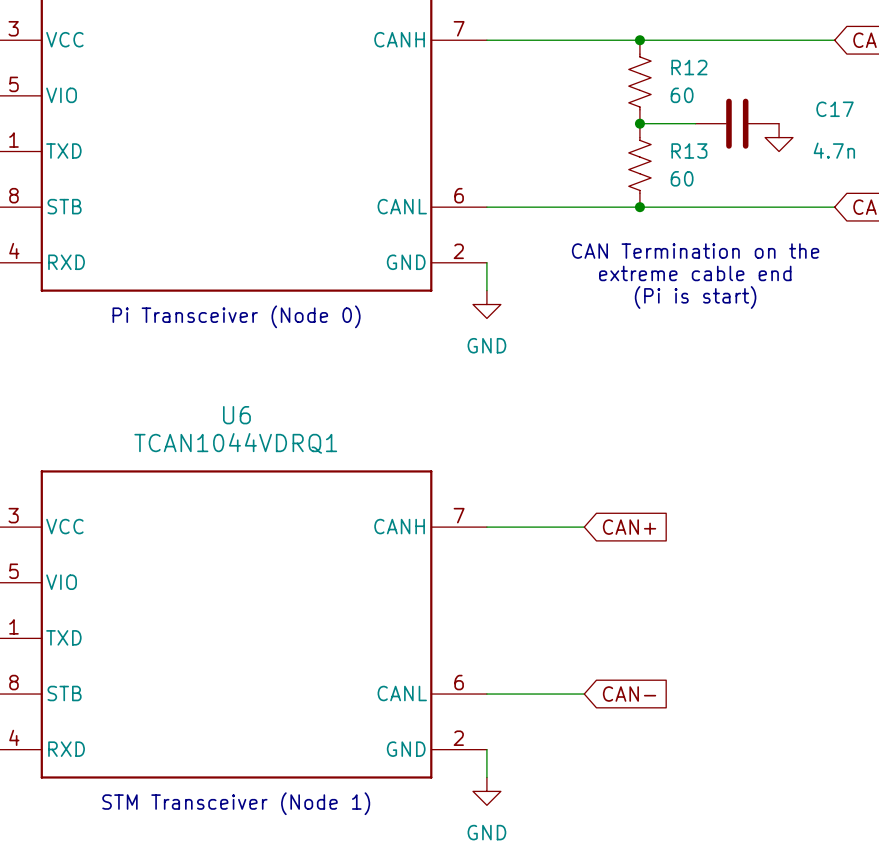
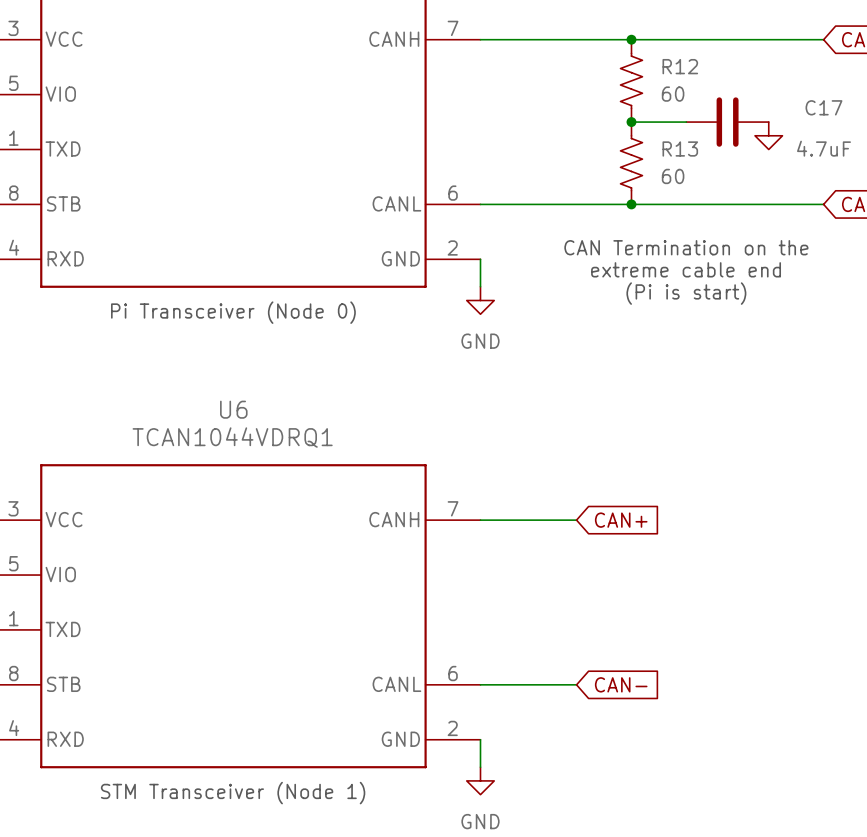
C17 value: 4.7n (834, 150) -> 4.7uF (823, 148)

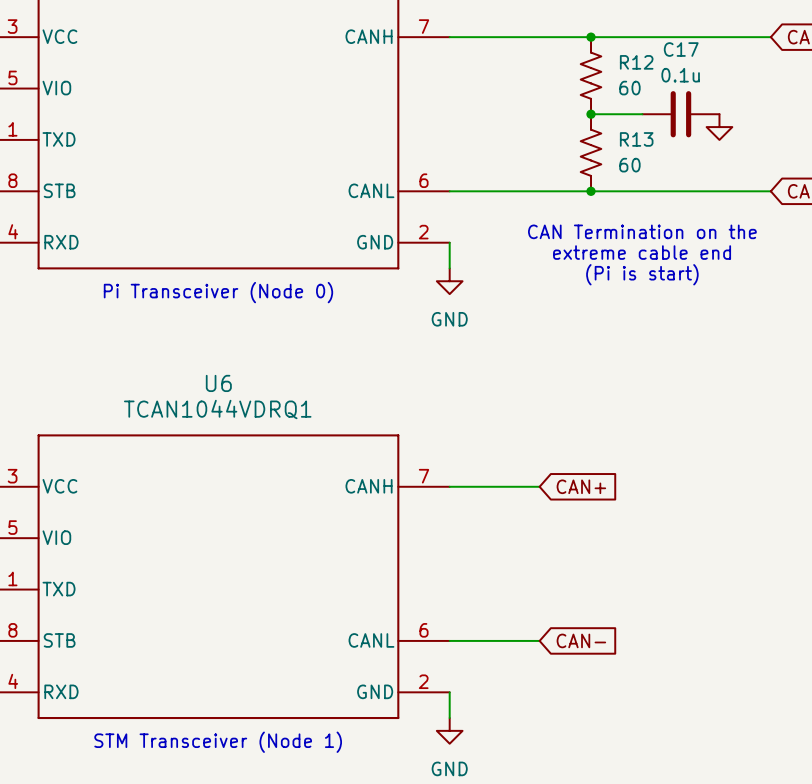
C17 name position: C17 (823, 107) -> C17 (681, 49)
C17 value: 4.7uF (823, 148) -> 0.1u (680, 75)

